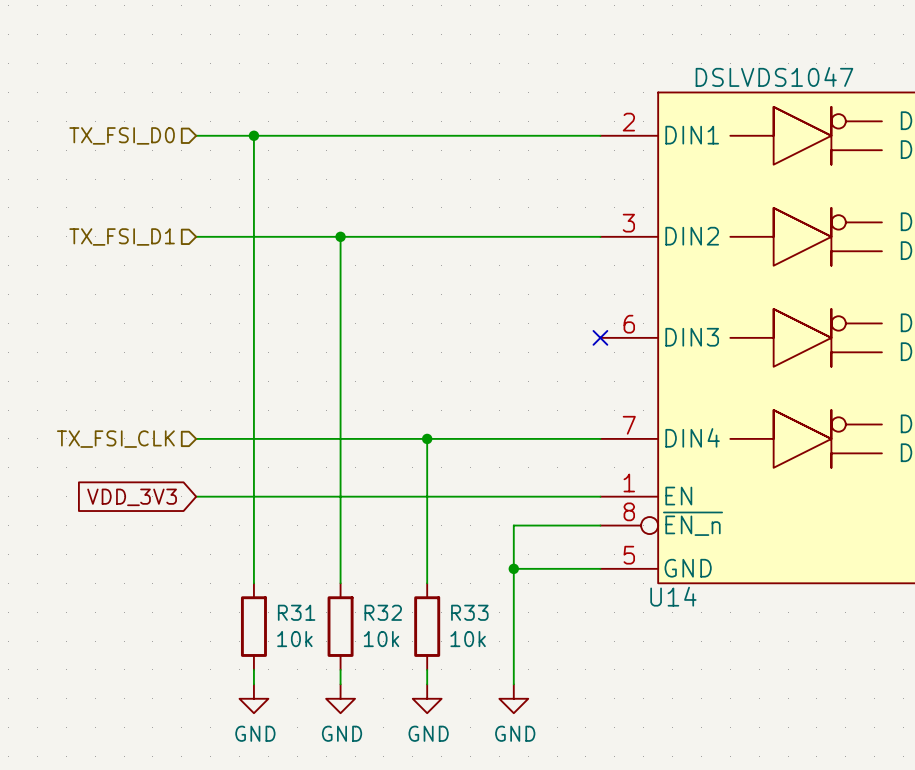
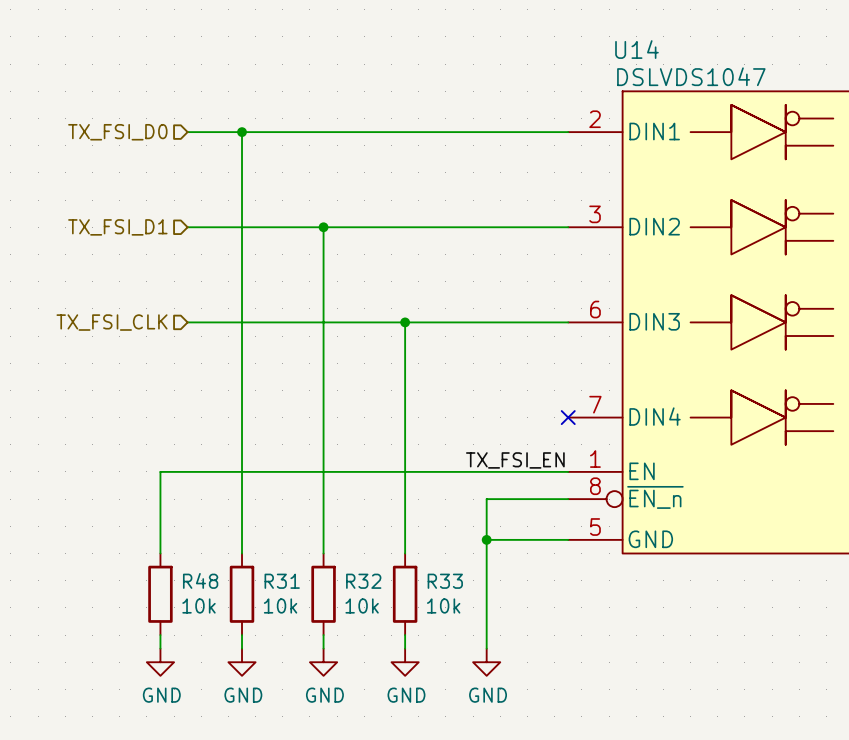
U14 value position: DSLVDS1047 (774, 76) -> DSLVDS1047 (691, 76)
wire: none -> (405, 322) (405, 417)
junction: none -> (405, 322)
no-connect mark: (600, 337) -> none
wire: (196, 438) (600, 438) -> (187, 322) (568, 322)
junction: (427, 438) -> none
no-connect mark: none -> (568, 417)
hierarchical label position: TX_FSI_CLK (115, 439) -> TX_FSI_CLK (112, 322)
label: none -> TX_FSI_EN (515, 460)
wire: none -> (187, 471) (160, 471) (160, 553)
global label: VDD_3V3 (132, 497) -> none
U14 name position: U14 (673, 596) -> U14 (636, 49)
R48: none -> 10k (160, 594)
wire: none -> (160, 635) (160, 648)
power symbol: none -> GND (160, 662)

